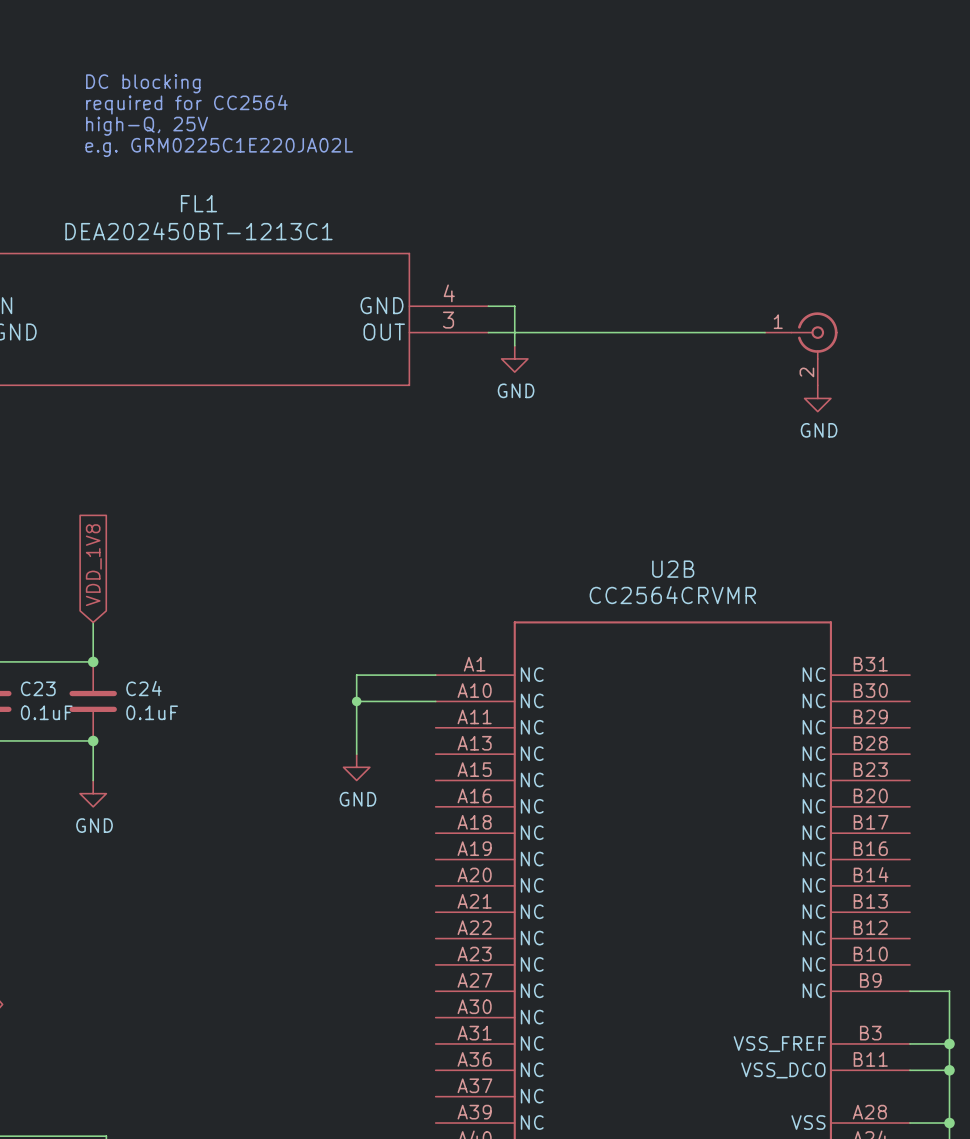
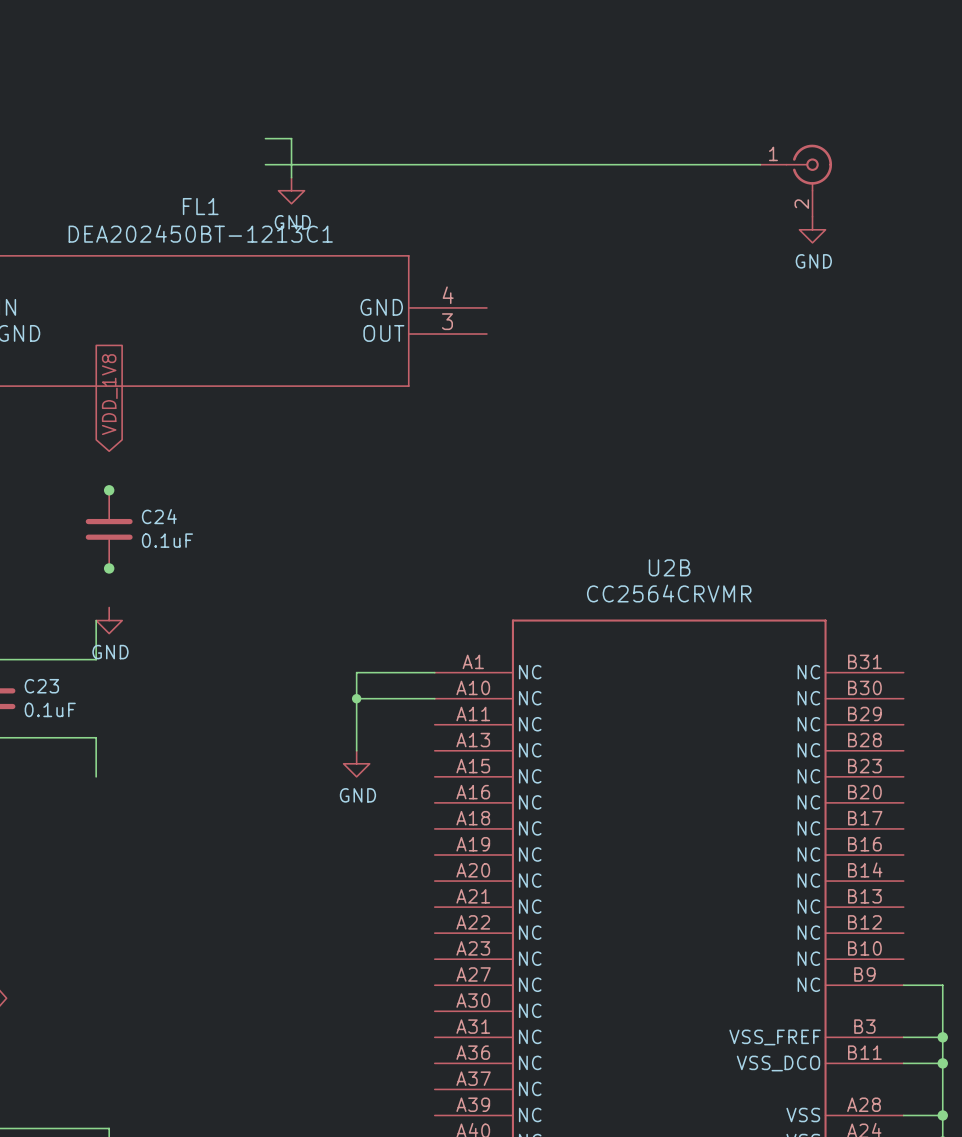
text: DC blocking (143, 83) -> none
text: required for CC2564 (186, 104) -> none
text: high-Q, 25V (147, 126) -> none
wire: none -> (265, 138) (291, 138) (291, 177)
text: e.g. GRM0225C1E220JA02L (219, 147) -> none
wire: none -> (265, 164) (760, 164)
power symbol: none -> GND (291, 190)
power symbol: none -> GND (812, 229)
wire: (488, 306) (514, 306) (514, 345) -> none
wire: (488, 332) (765, 332) -> none
part position: (801, 348) -> (796, 180)
power symbol: GND (514, 358) -> none
power symbol: GND (817, 398) -> none
junction: none -> (109, 490)
global label position: VDD_1V8 (93, 565) -> VDD_1V8 (109, 394)
junction: none -> (109, 568)
power symbol: none -> GND (109, 620)
junction: (93, 661) -> none
C24 position: (93, 701) -> (109, 529)
junction: (93, 740) -> none
power symbol: GND (93, 793) -> none

